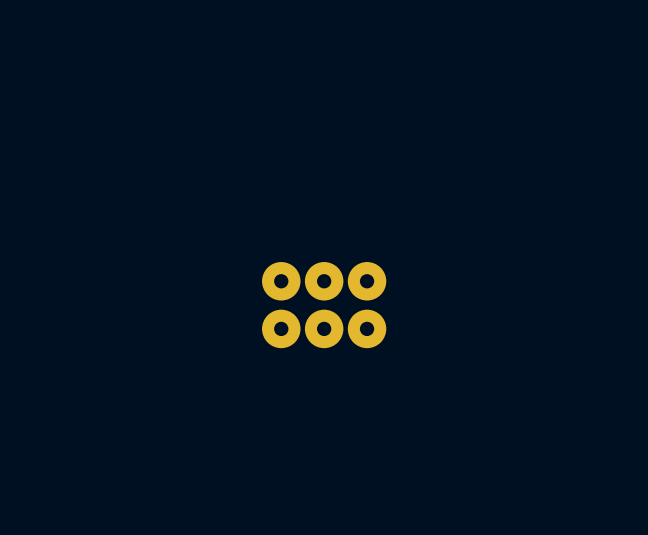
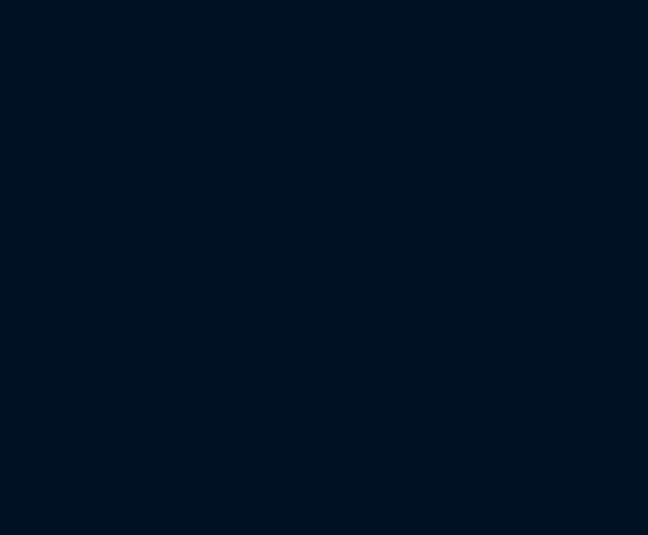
part: (324, 305) -> none

